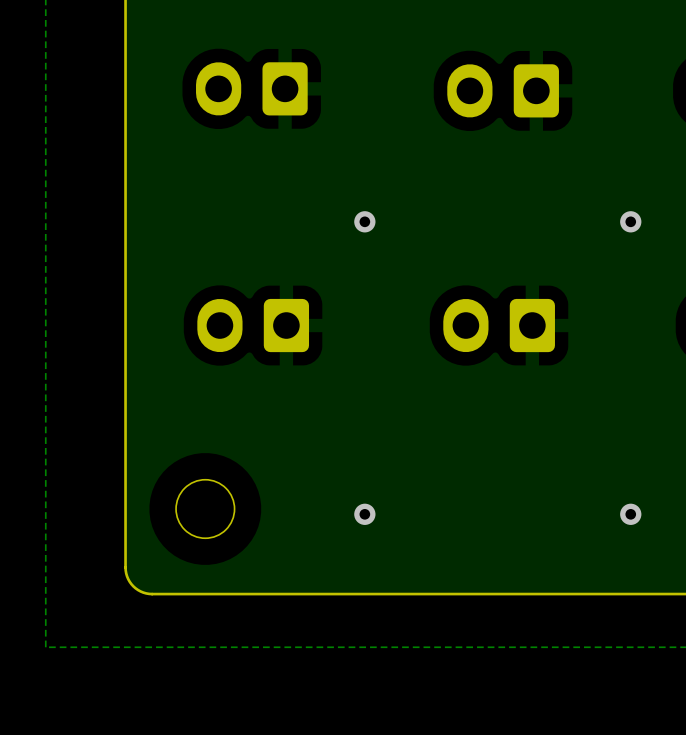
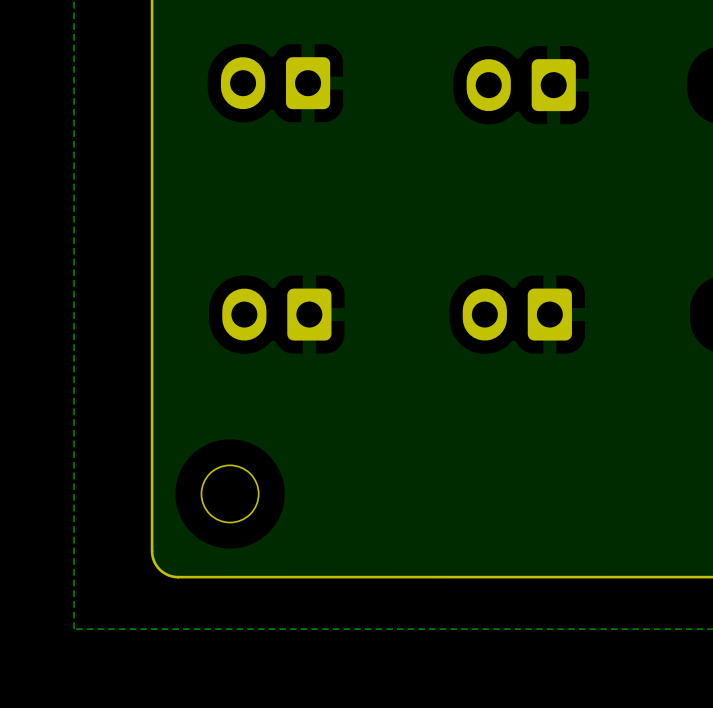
via: (364, 221) -> none
via: (630, 221) -> none
via: (364, 514) -> none
via: (630, 514) -> none

